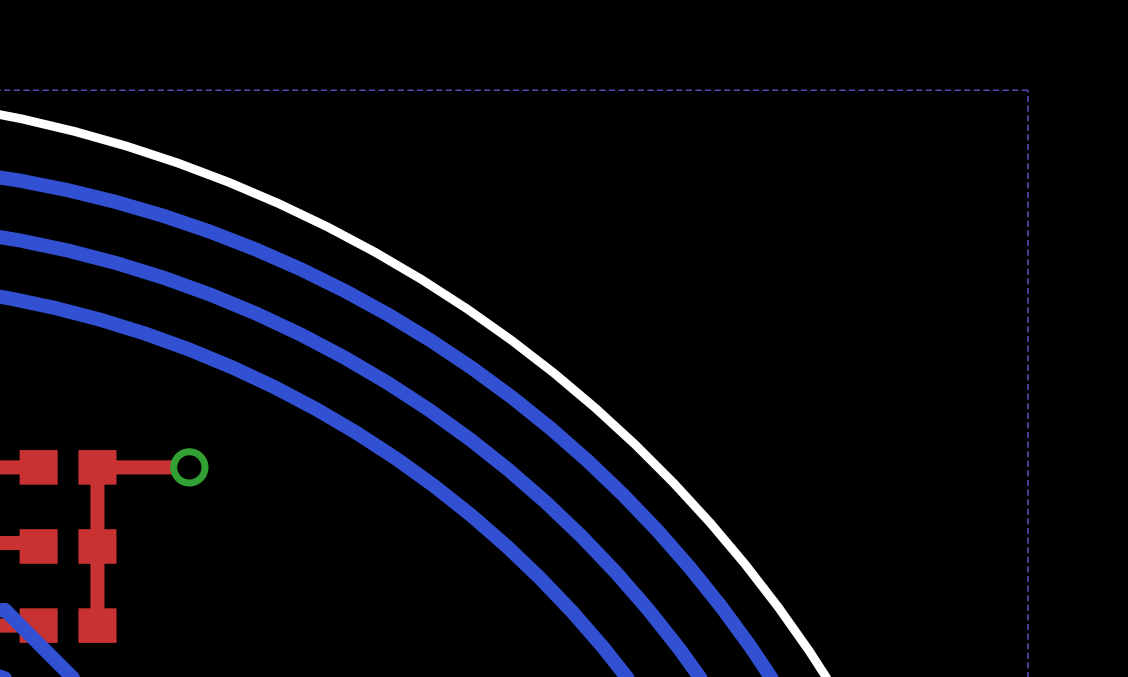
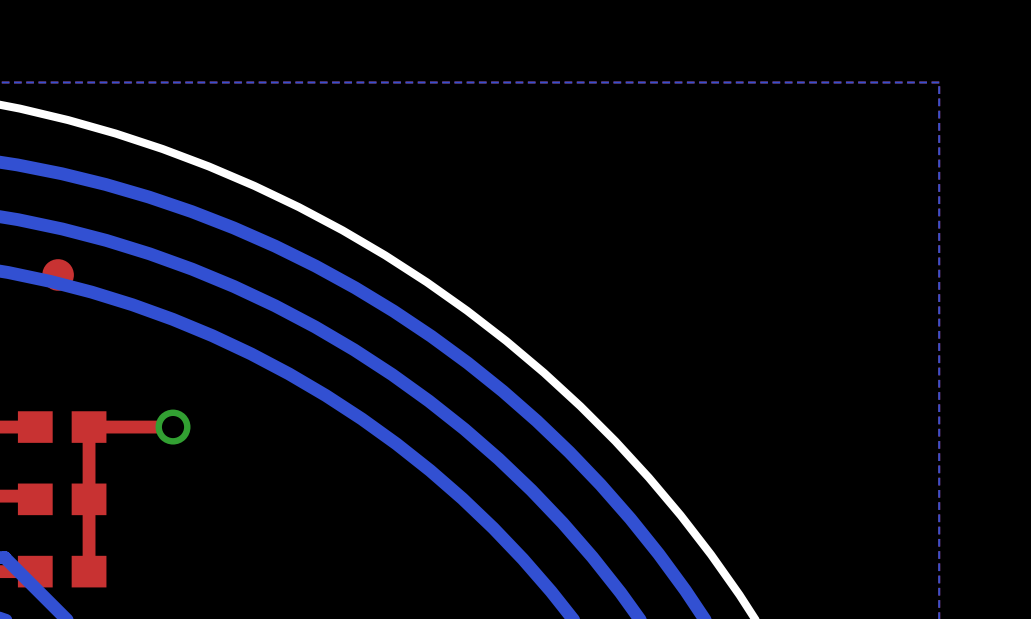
part: none -> (58, 274)

